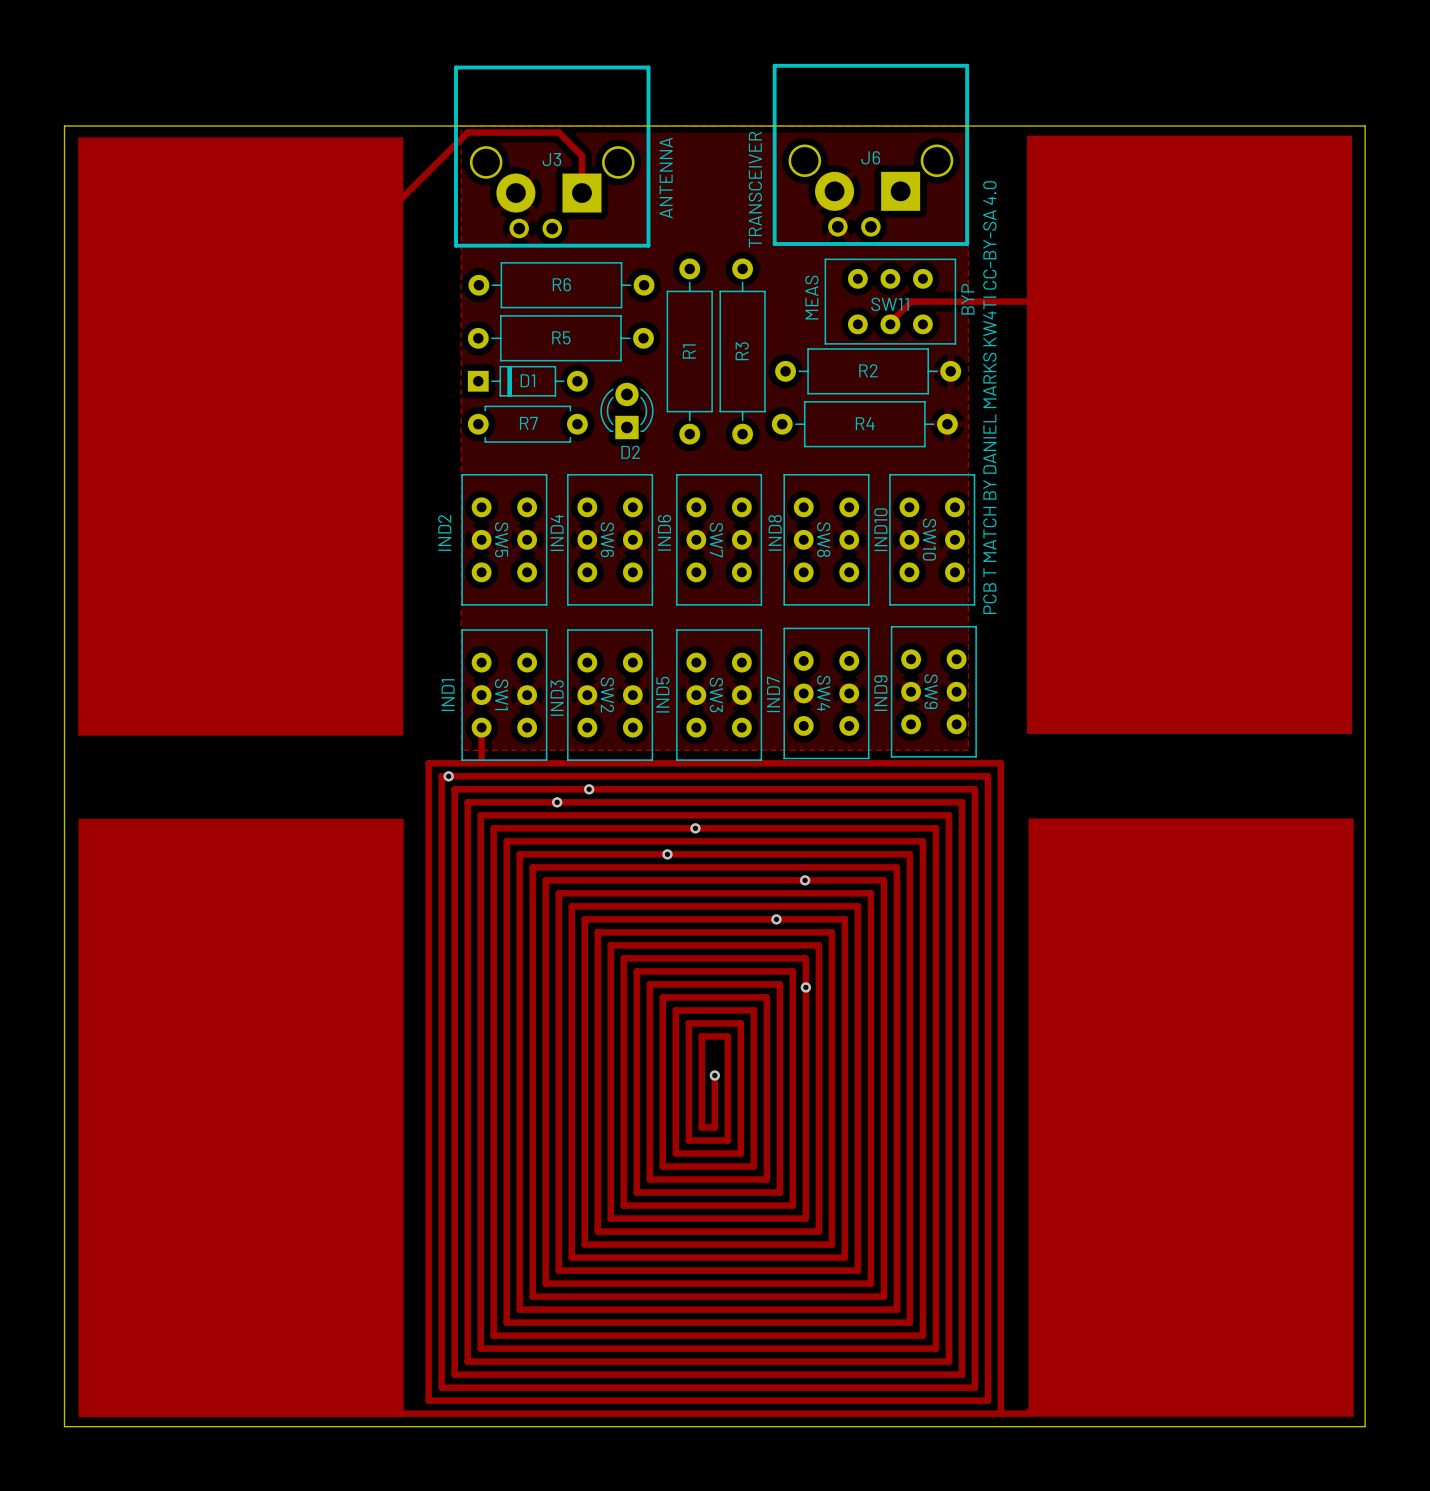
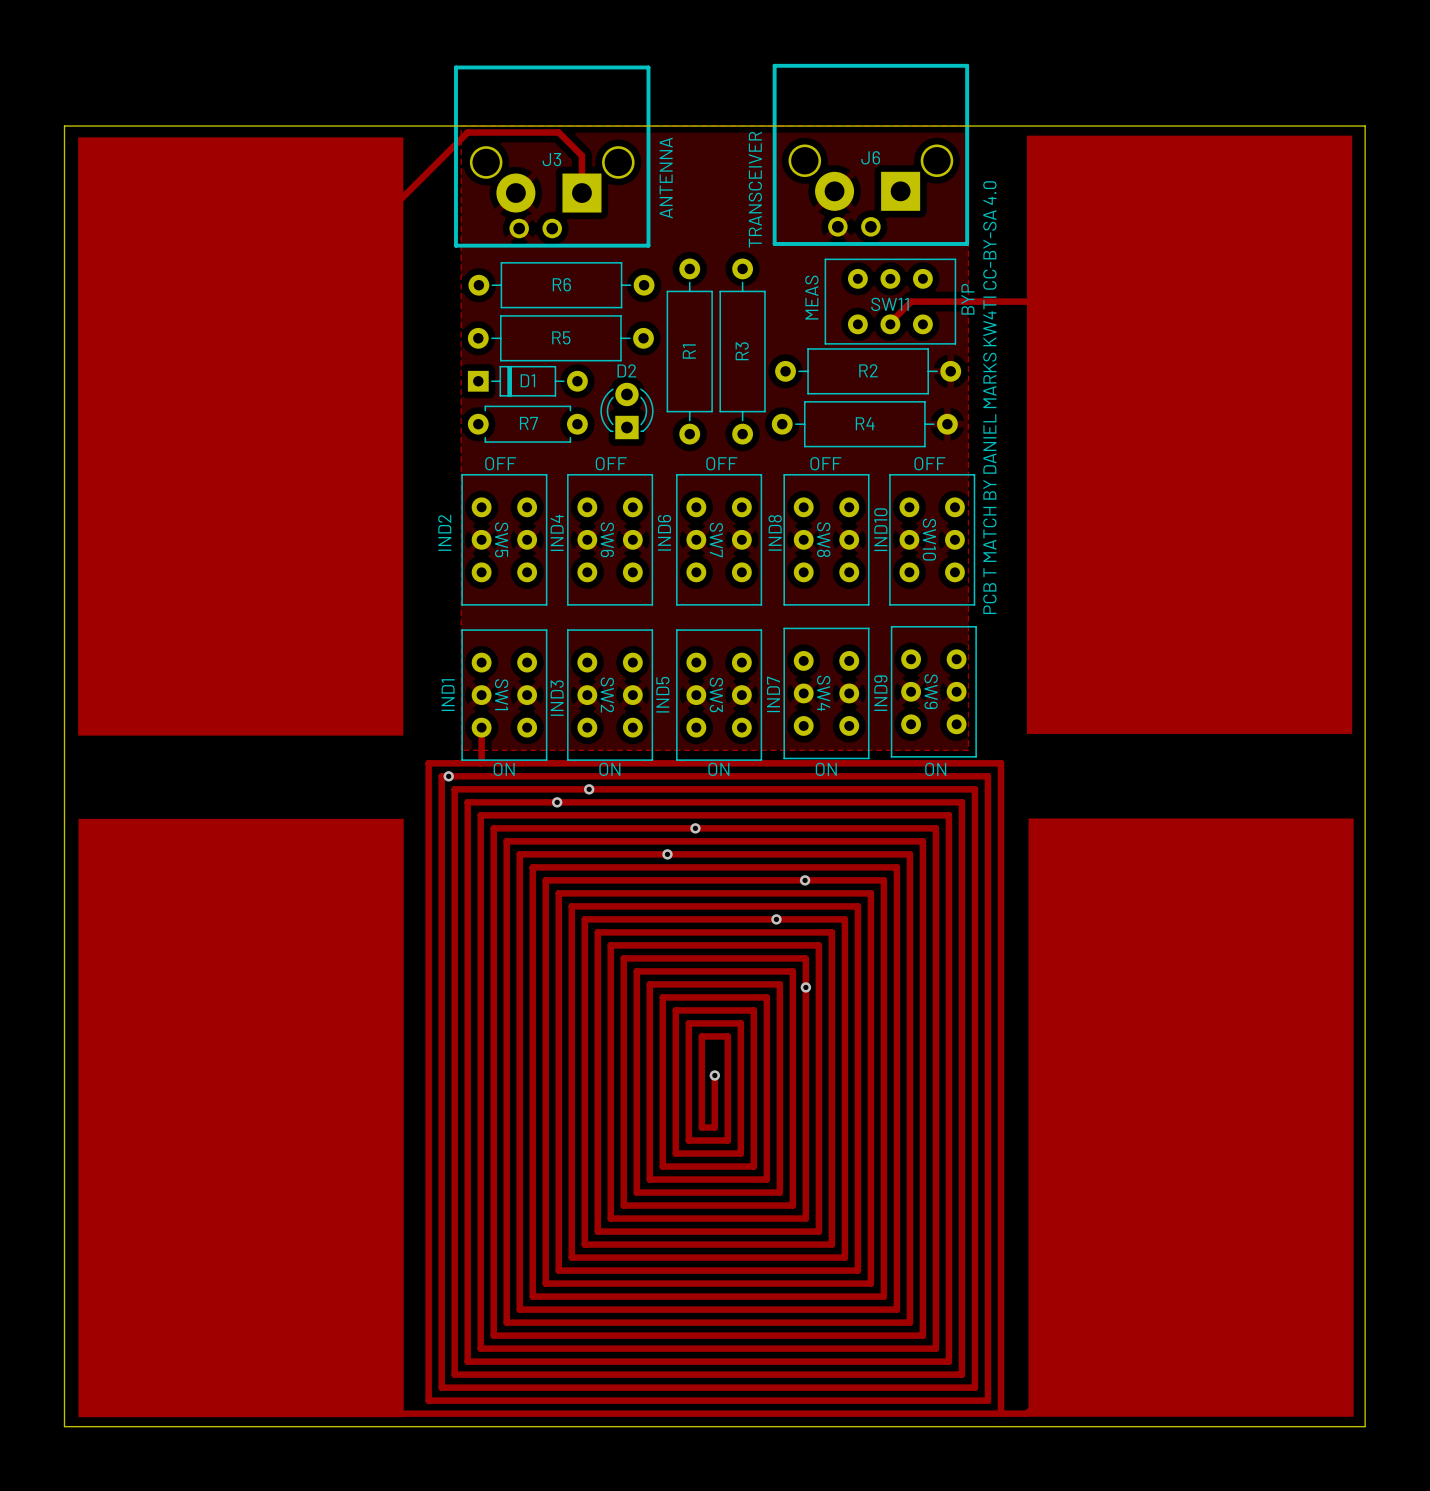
D2 name position: D2 (630, 452) -> D2 (626, 370)
text: none -> OFF (500, 463)
text: none -> OFF (611, 463)
text: none -> OFF (721, 463)
text: none -> OFF (825, 463)
text: none -> OFF (929, 463)
text: none -> ON (504, 769)
text: none -> ON (609, 769)
text: none -> ON (718, 769)
text: none -> ON (826, 769)
text: none -> ON (935, 769)

